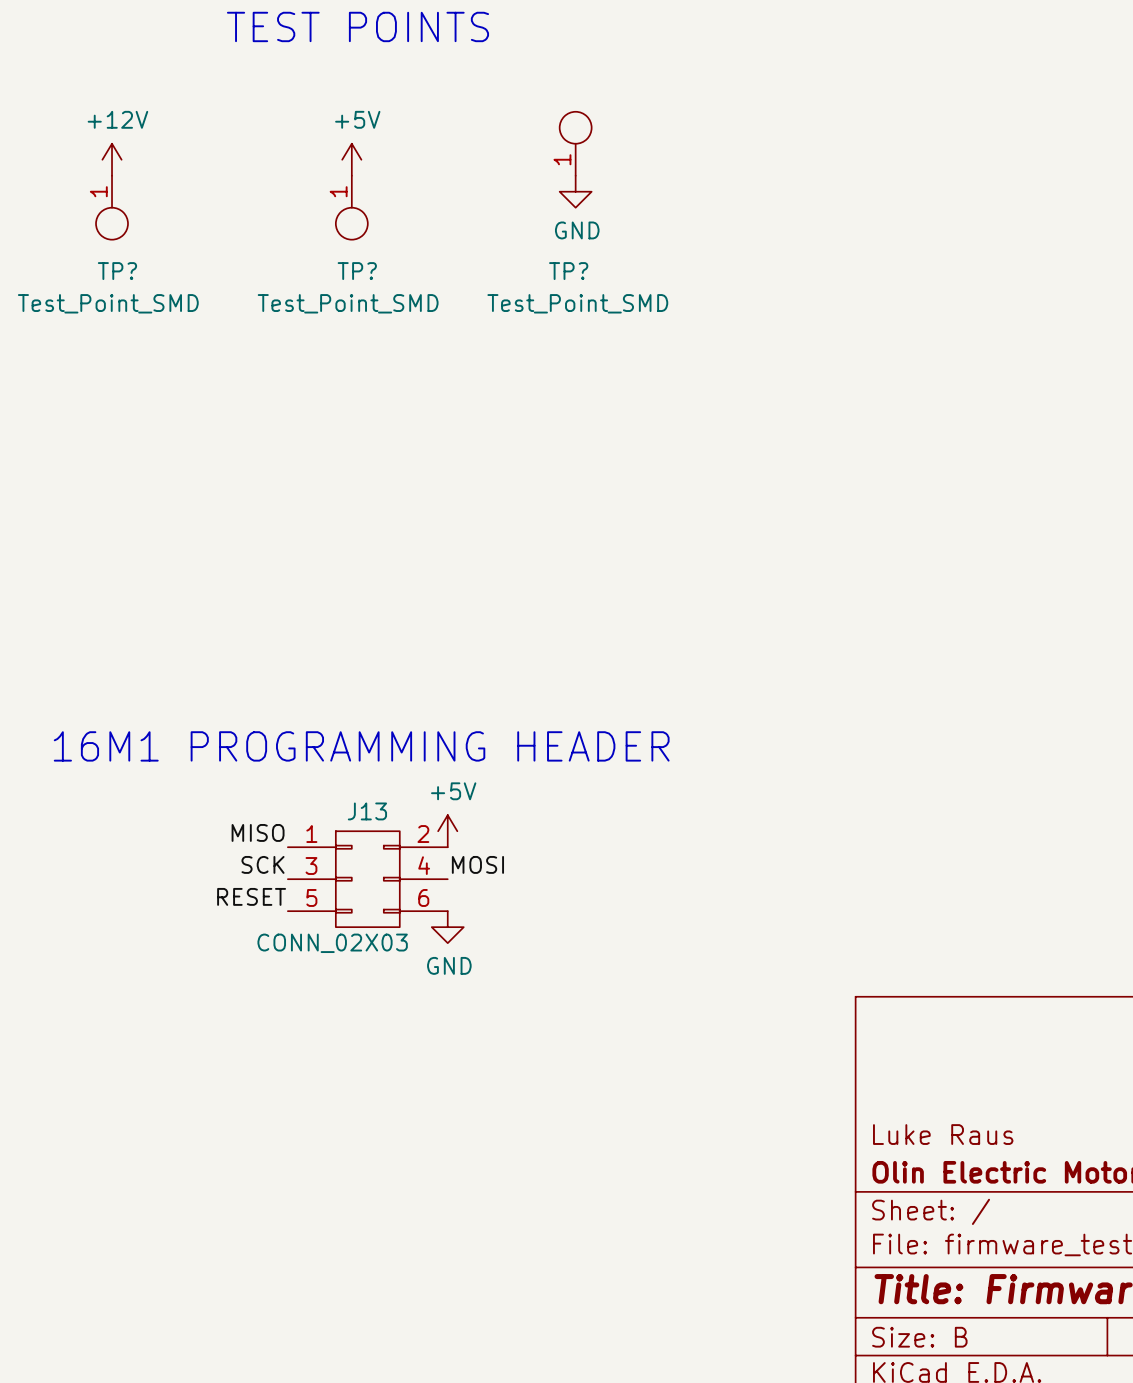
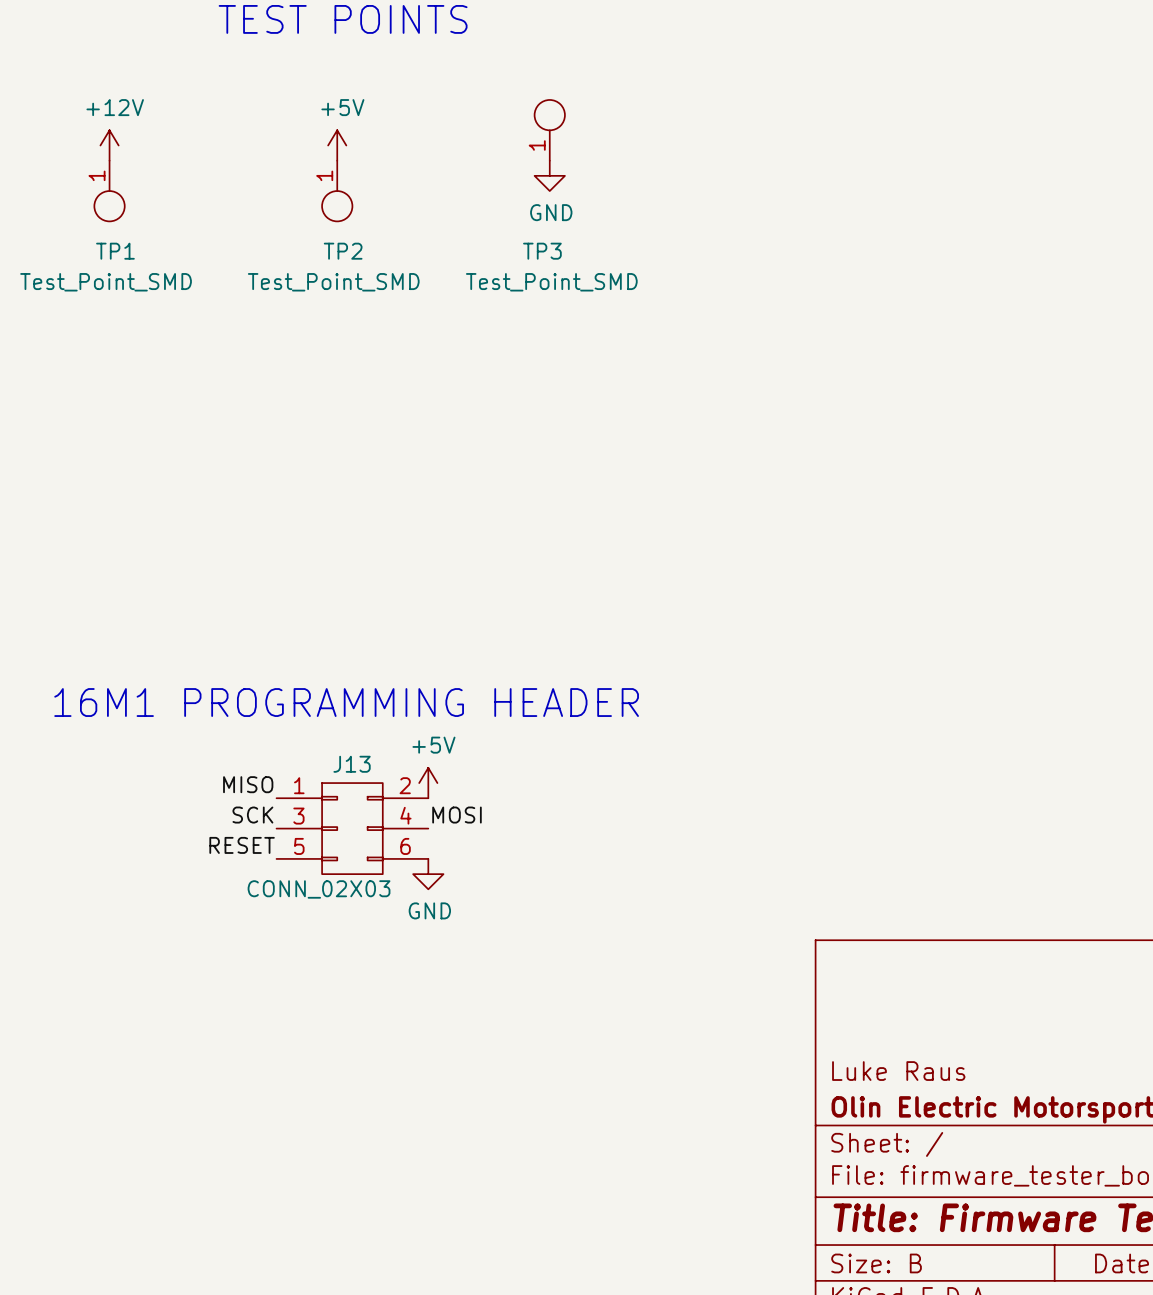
TP? name: TP? (117, 271) -> TP1 (115, 251)
TP? name: TP? (357, 271) -> TP2 (343, 251)
TP? name: TP? (568, 271) -> TP3 (542, 251)

